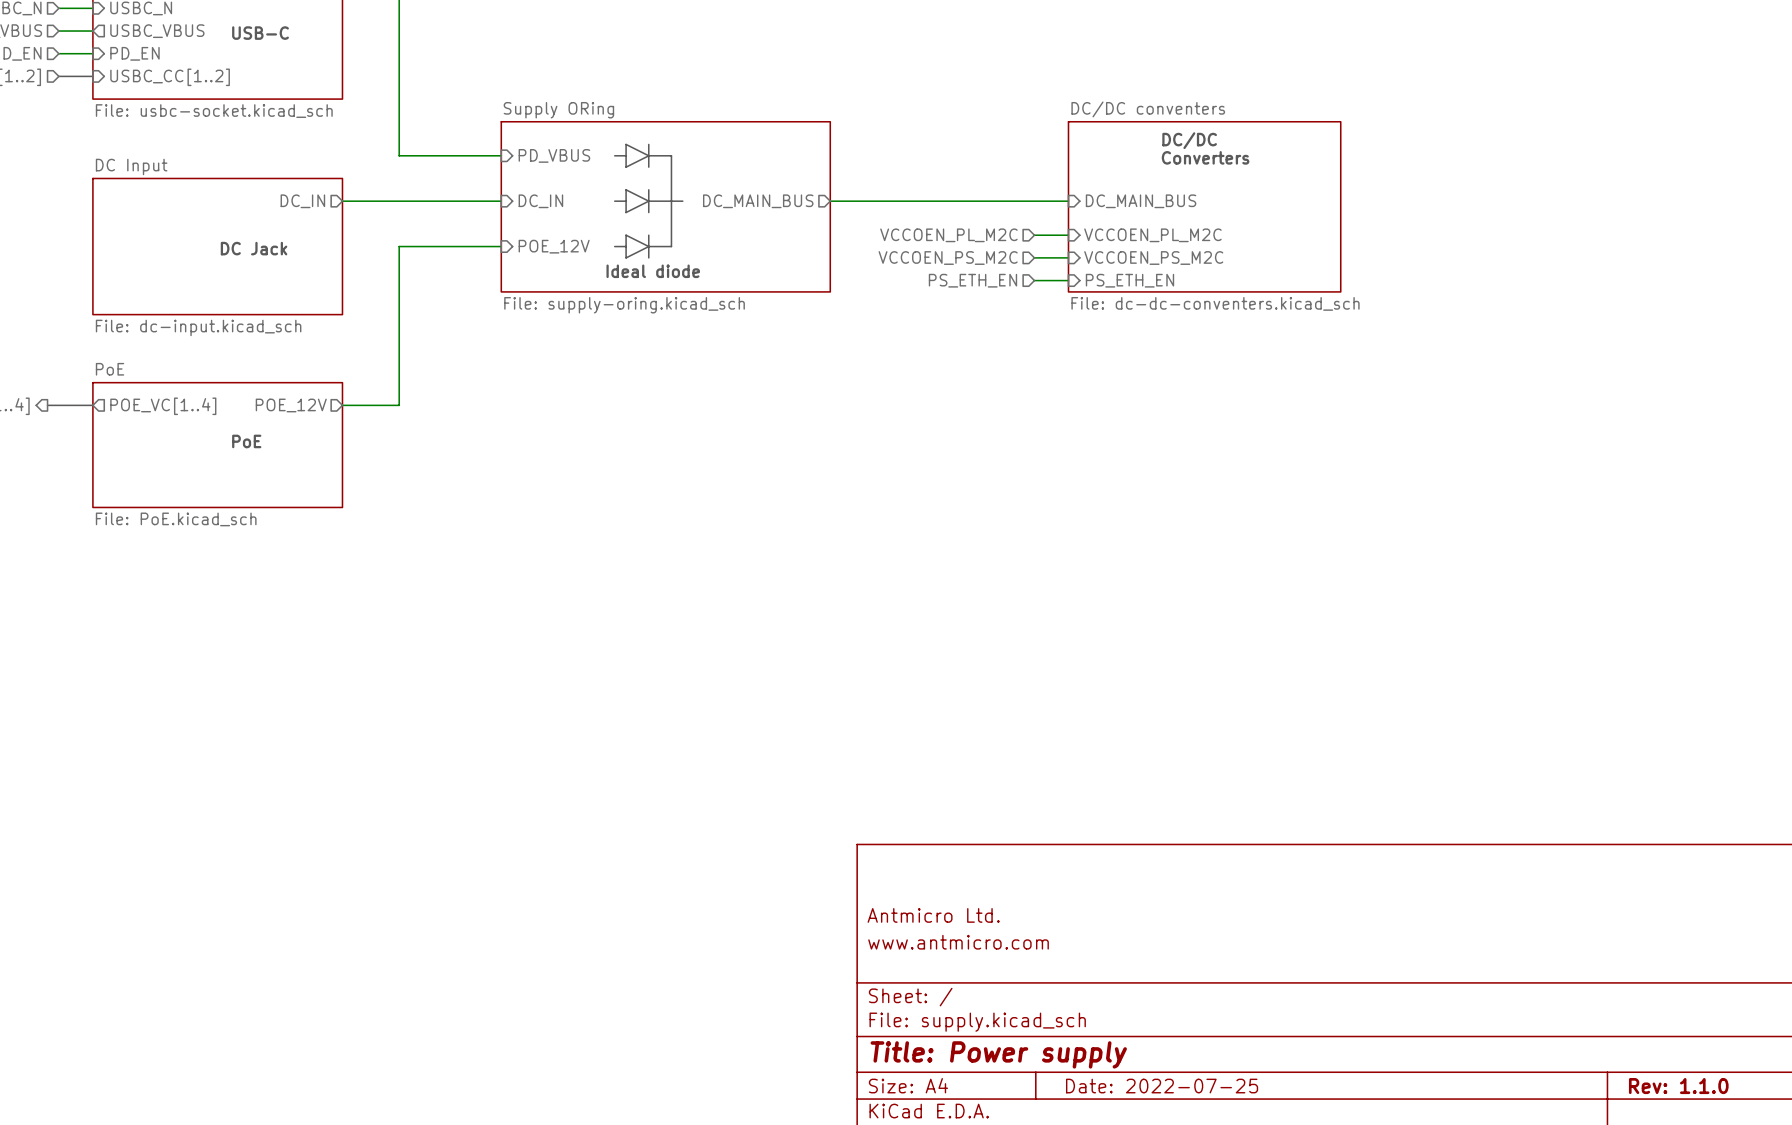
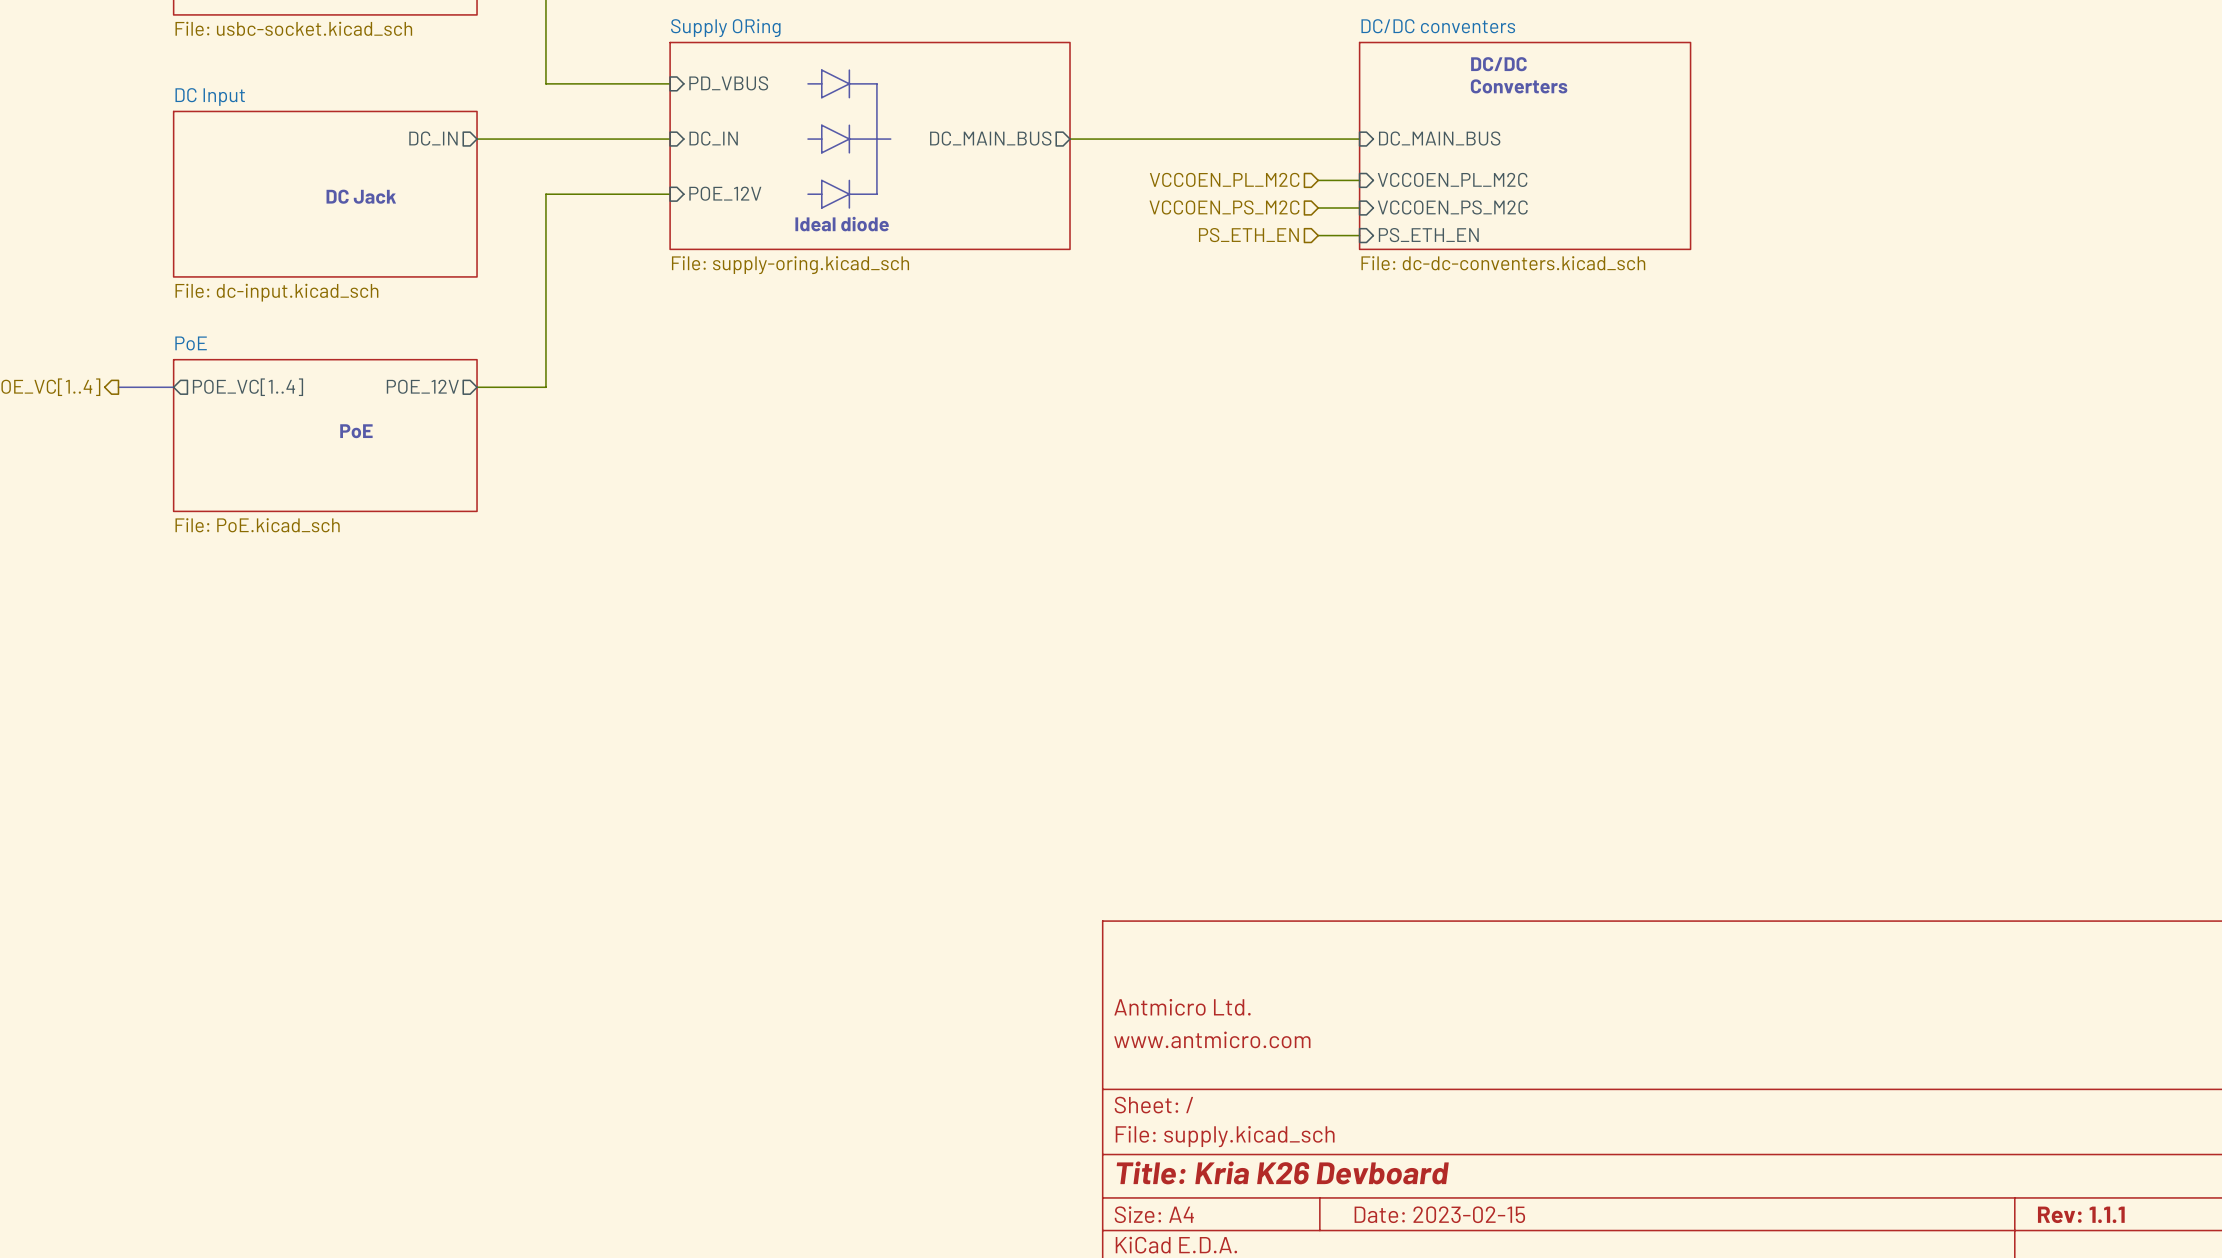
title block: Title: Power supply (998, 1054) -> Title: Kria K26 Devboard (1282, 1172)
title block: Date: 2022-07-25 (1162, 1086) -> Date: 2023-02-15 (1439, 1214)
title block: Rev: 1.1.0 (1678, 1086) -> Rev: 1.1.1 (2081, 1214)

